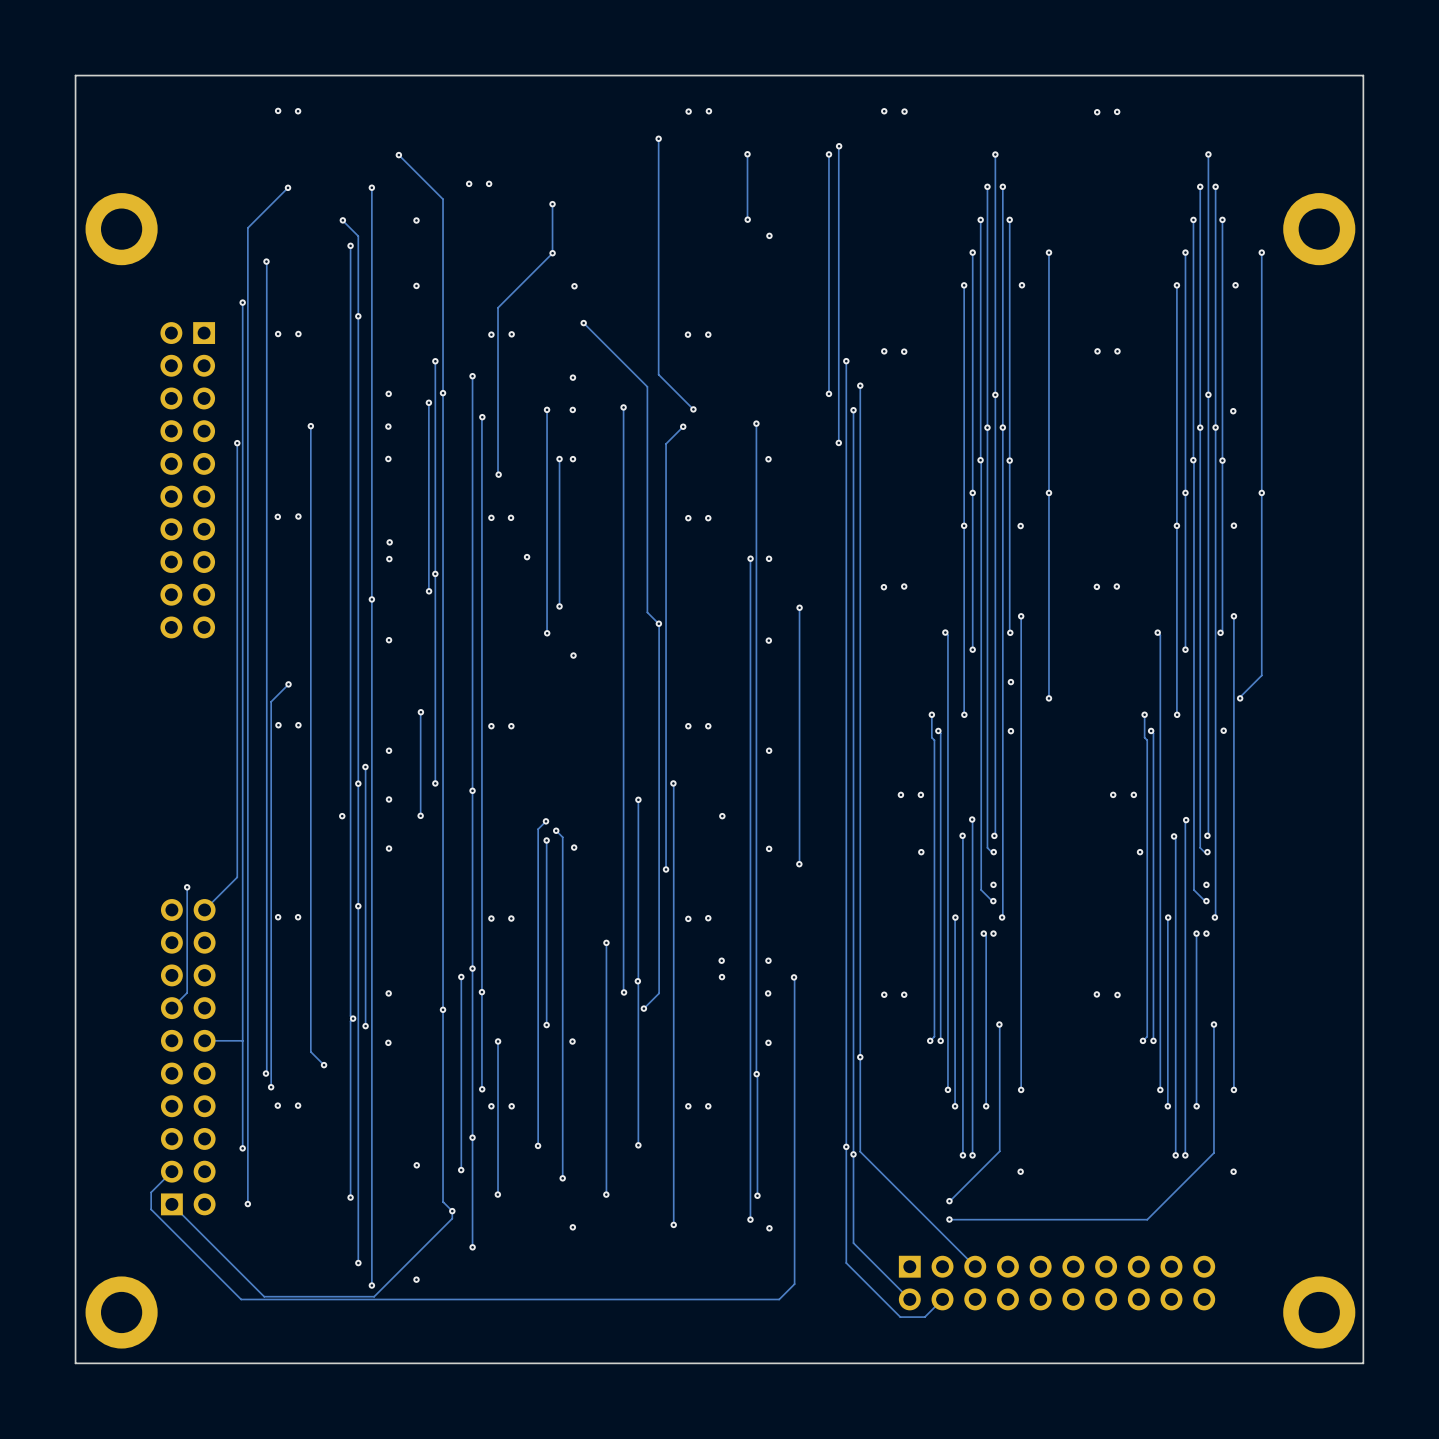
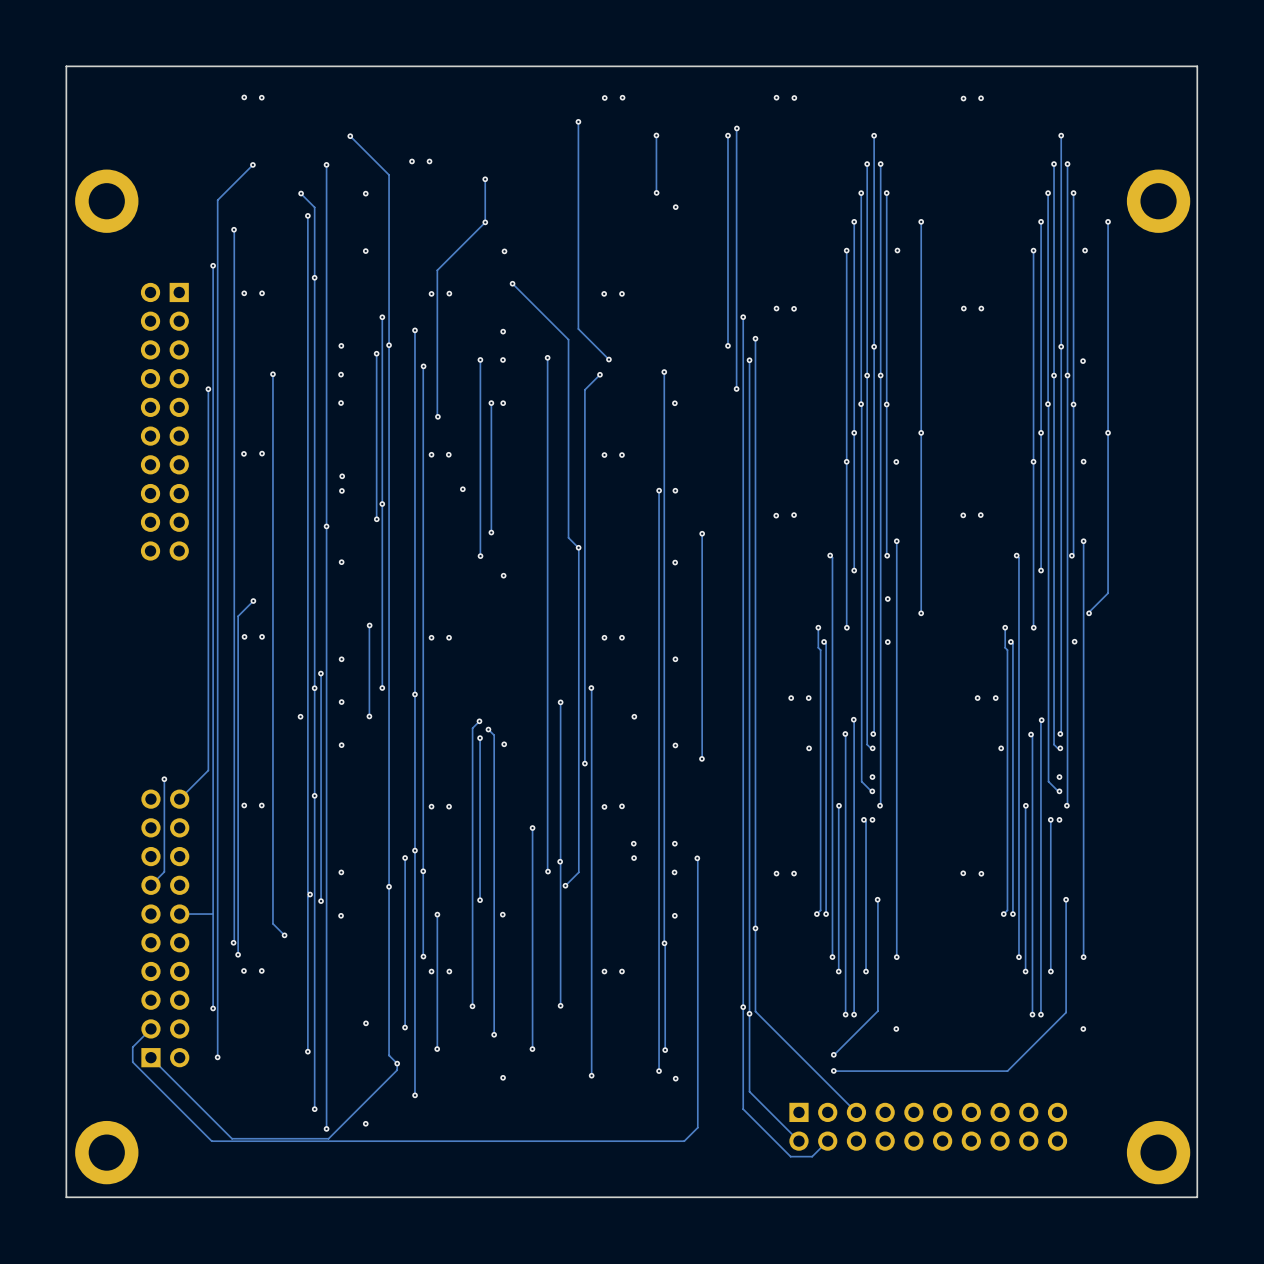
via: (472, 1137) -> none

